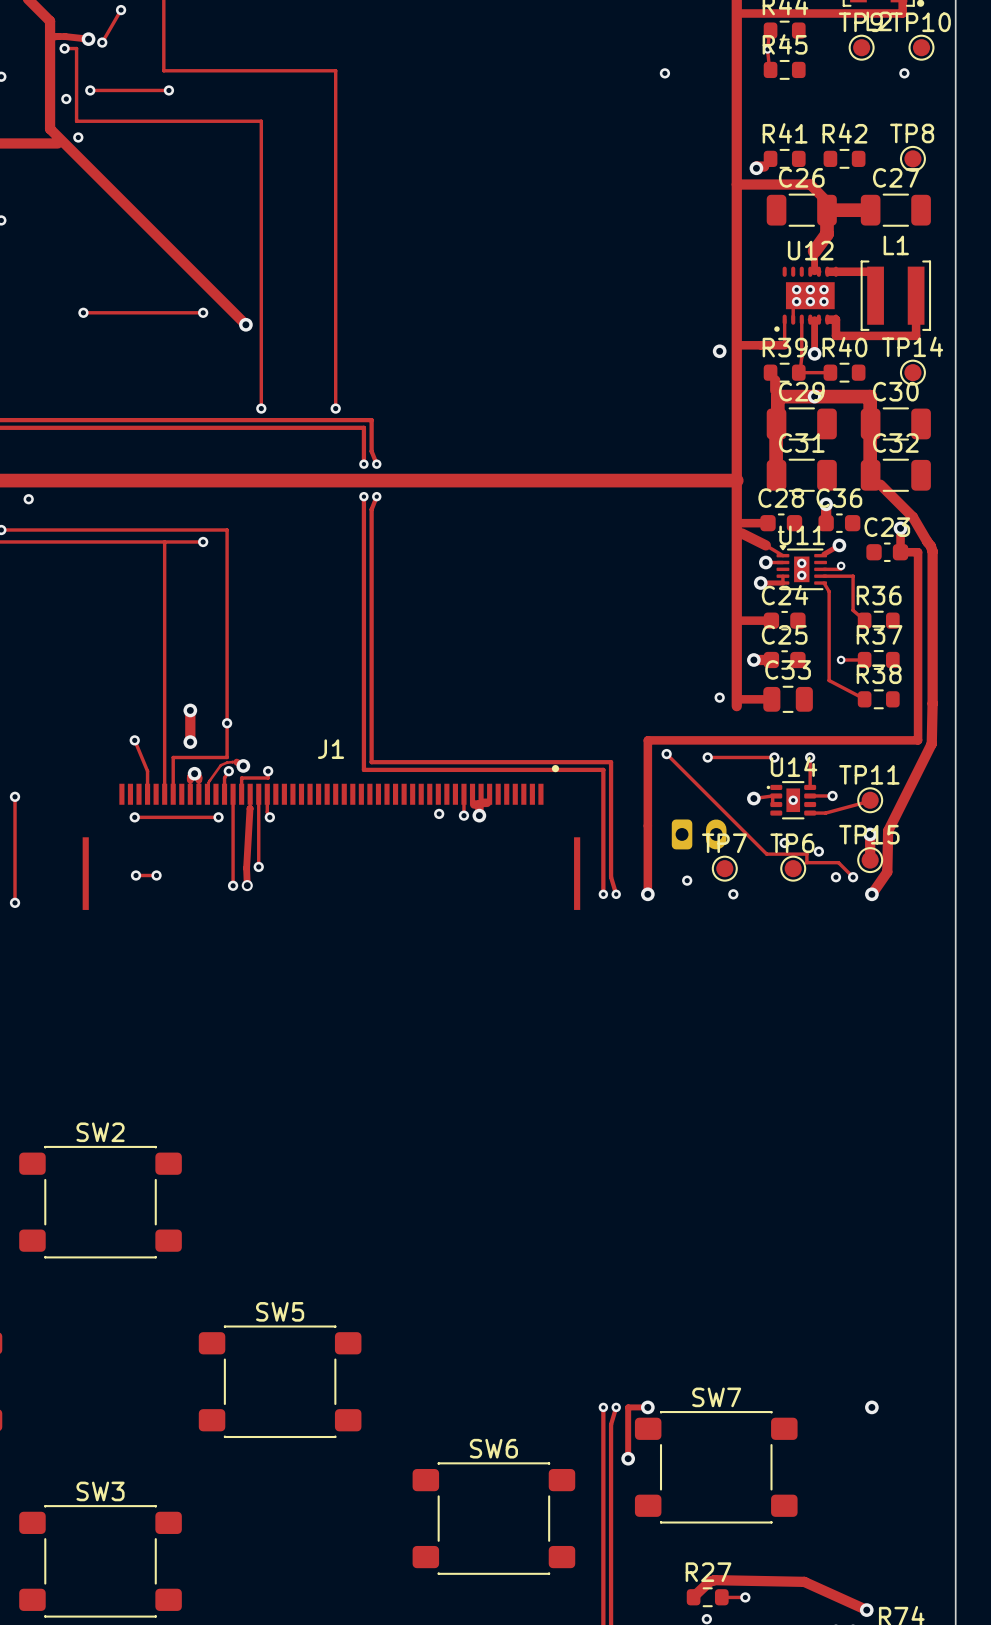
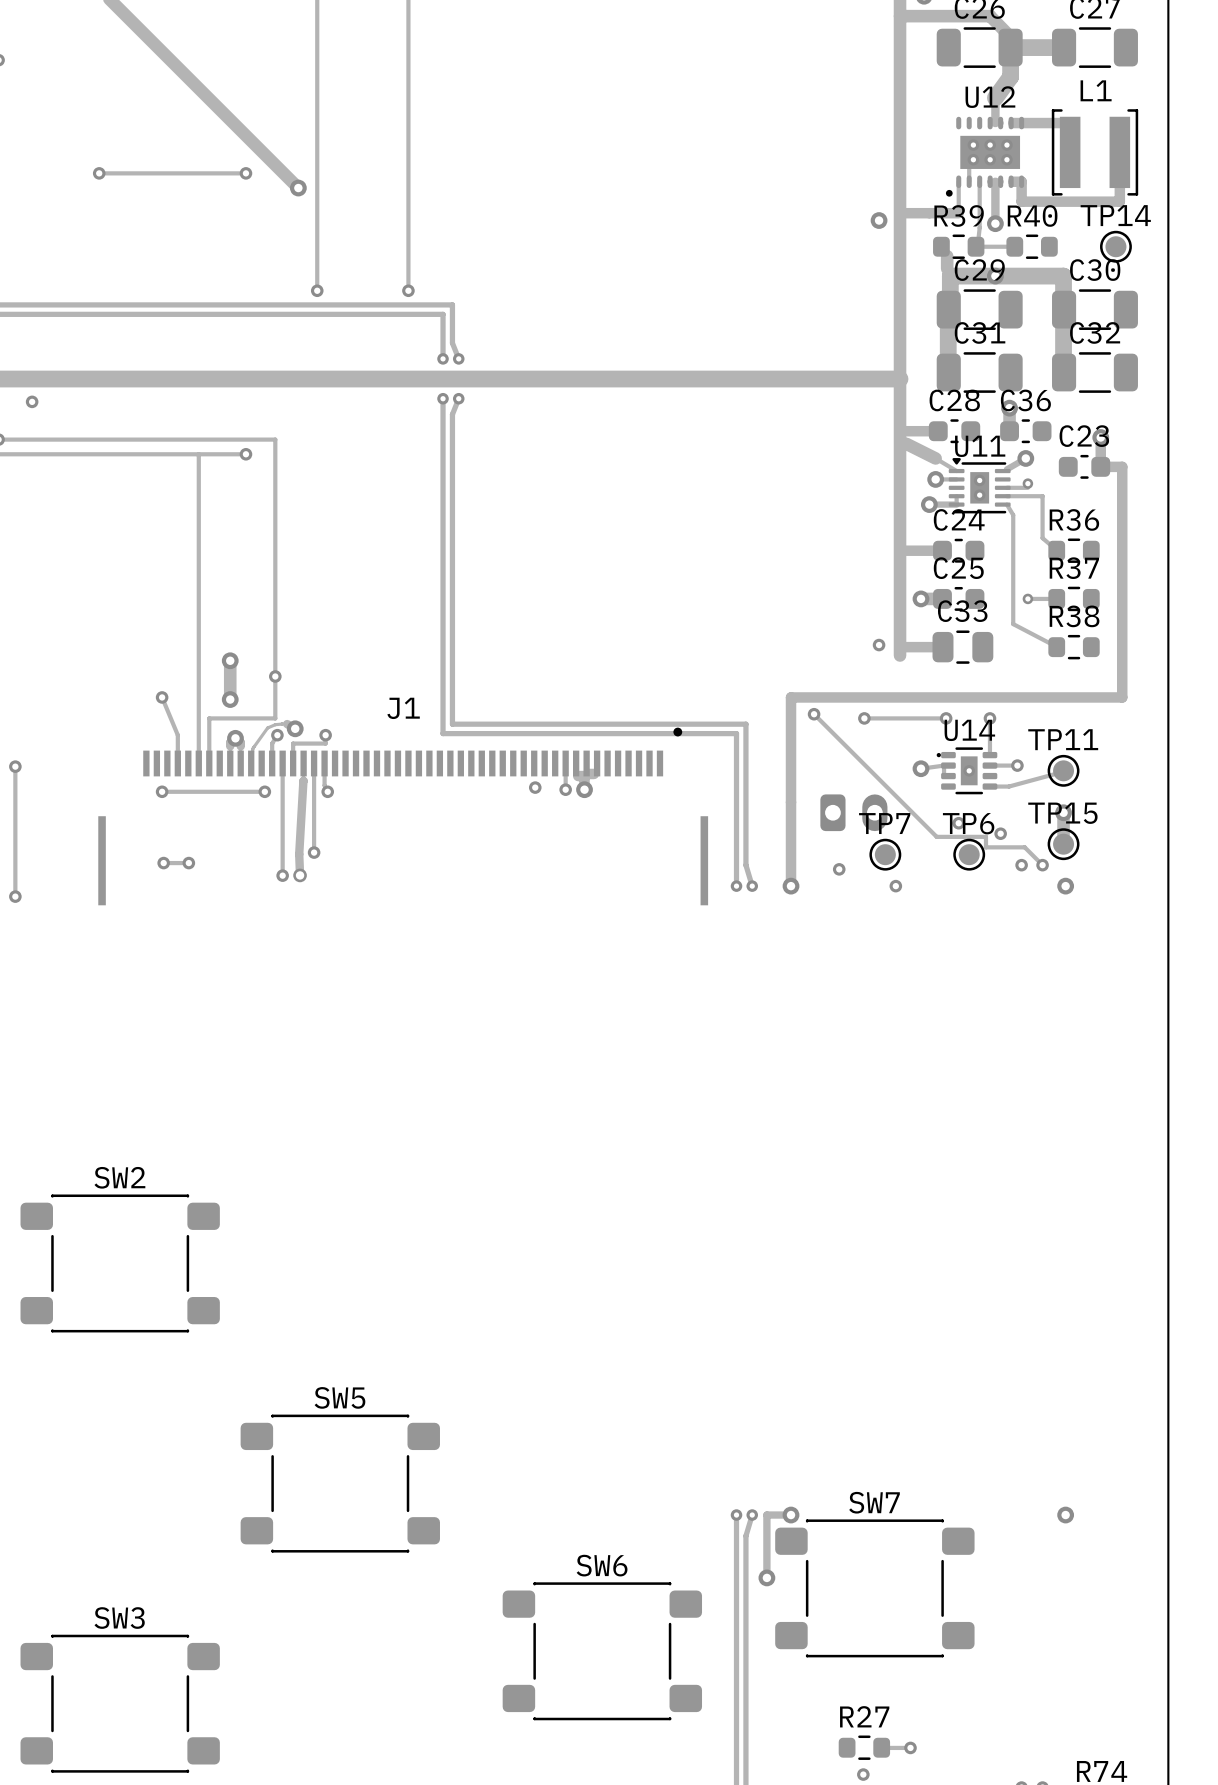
track: (880, 484) (912, 517) (932, 551) (932, 703) (931, 743) (888, 831) (887, 872) (871, 894) -> none
track: (693, 1597) (709, 1581) (714, 1580) (804, 1581) (866, 1610) -> none
via: (866, 1610) -> none

